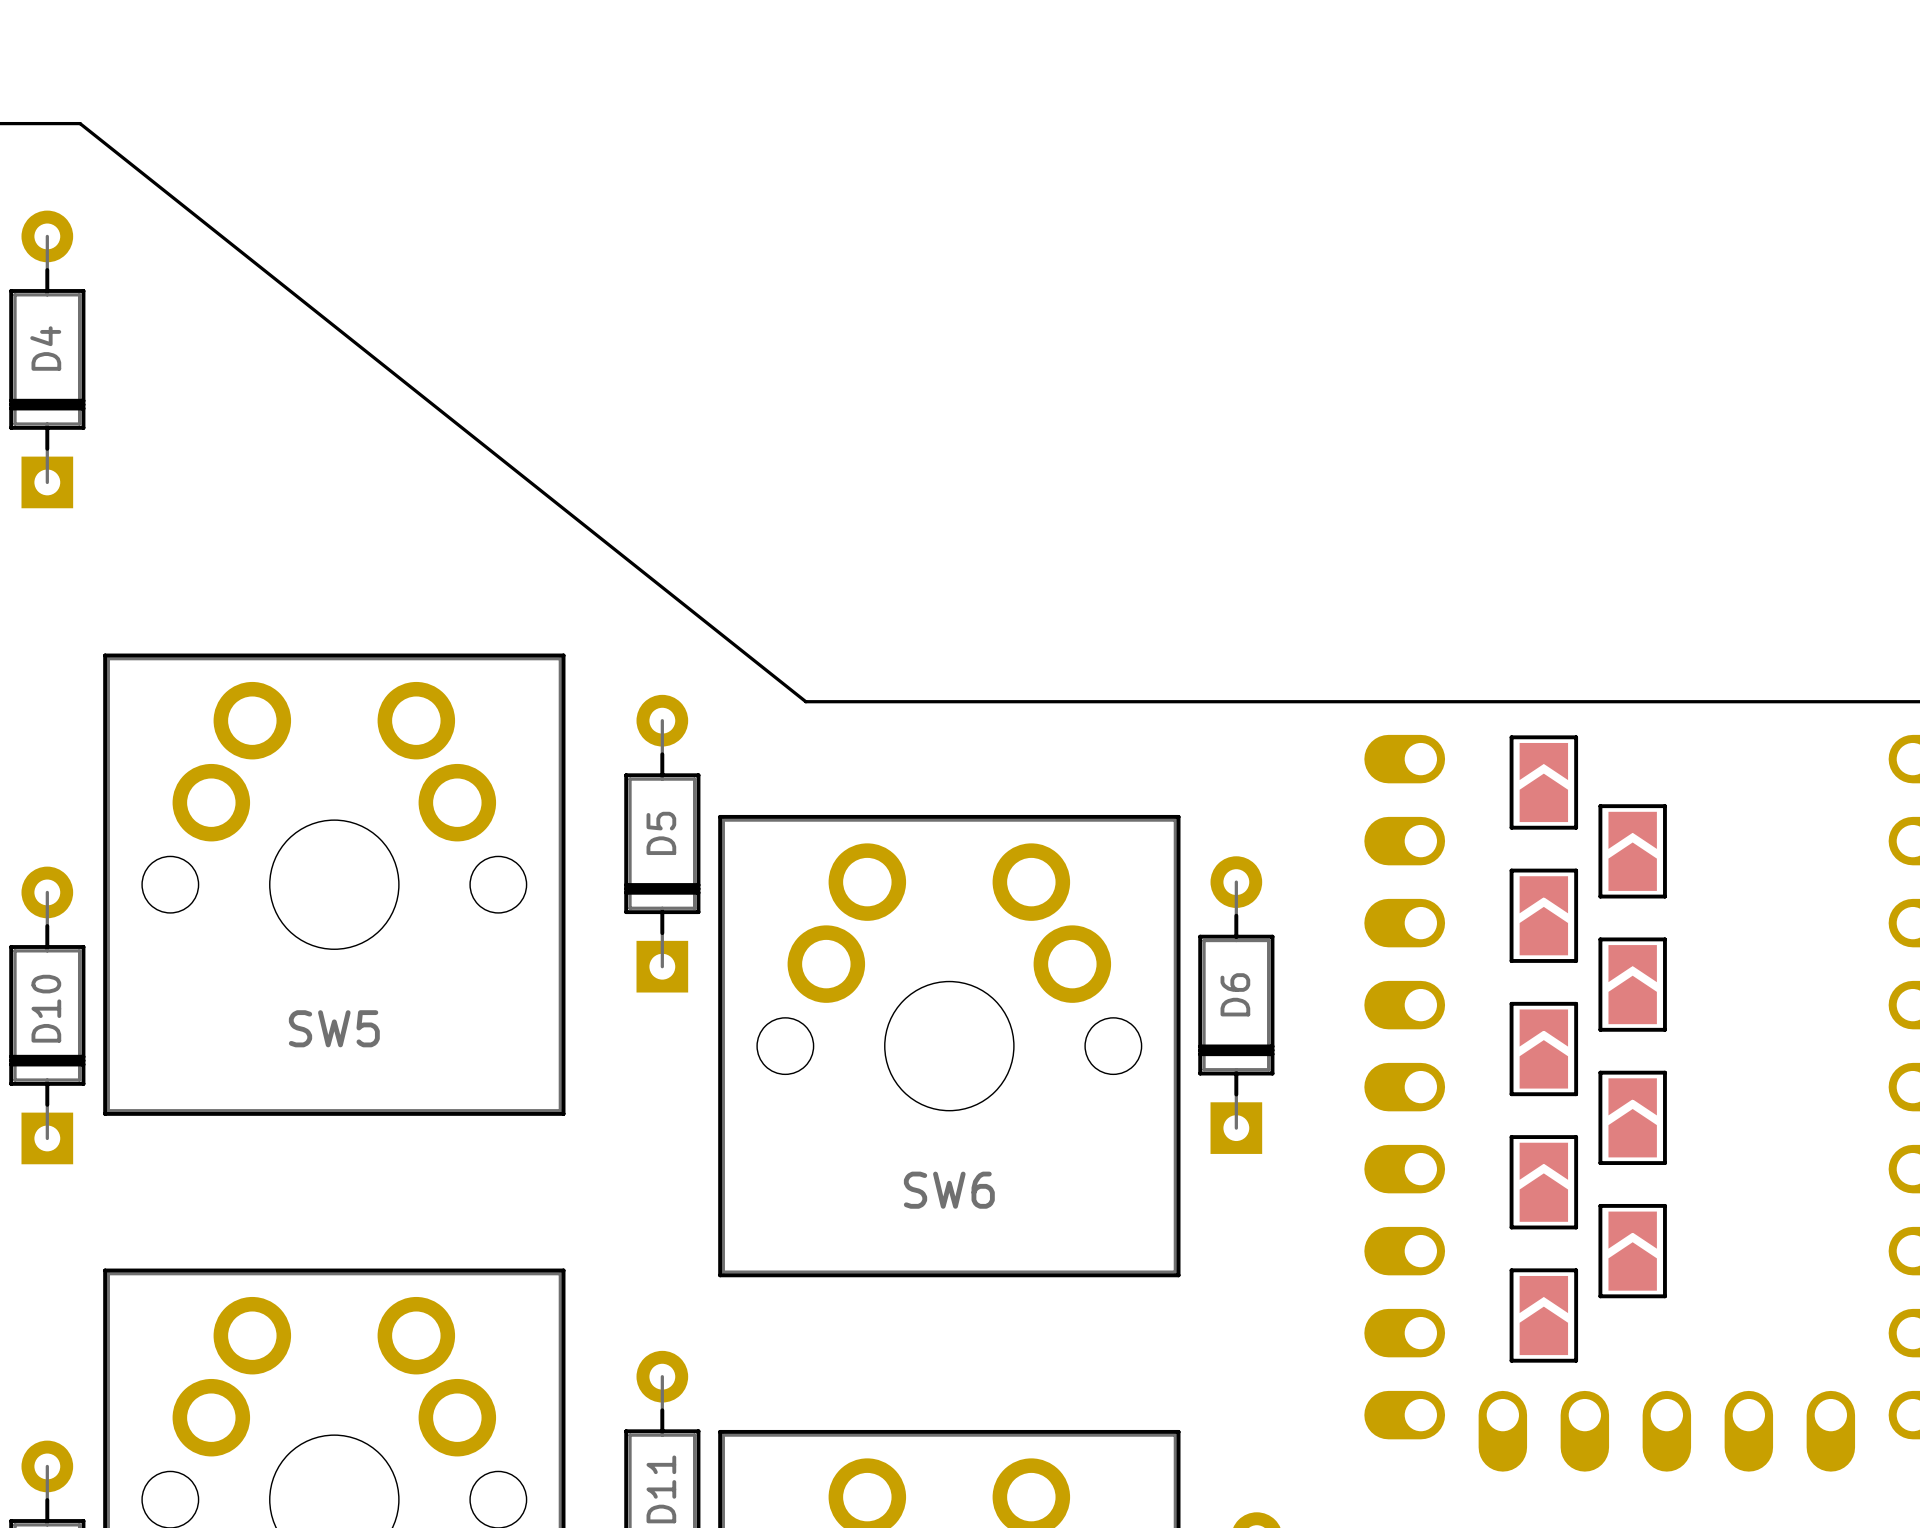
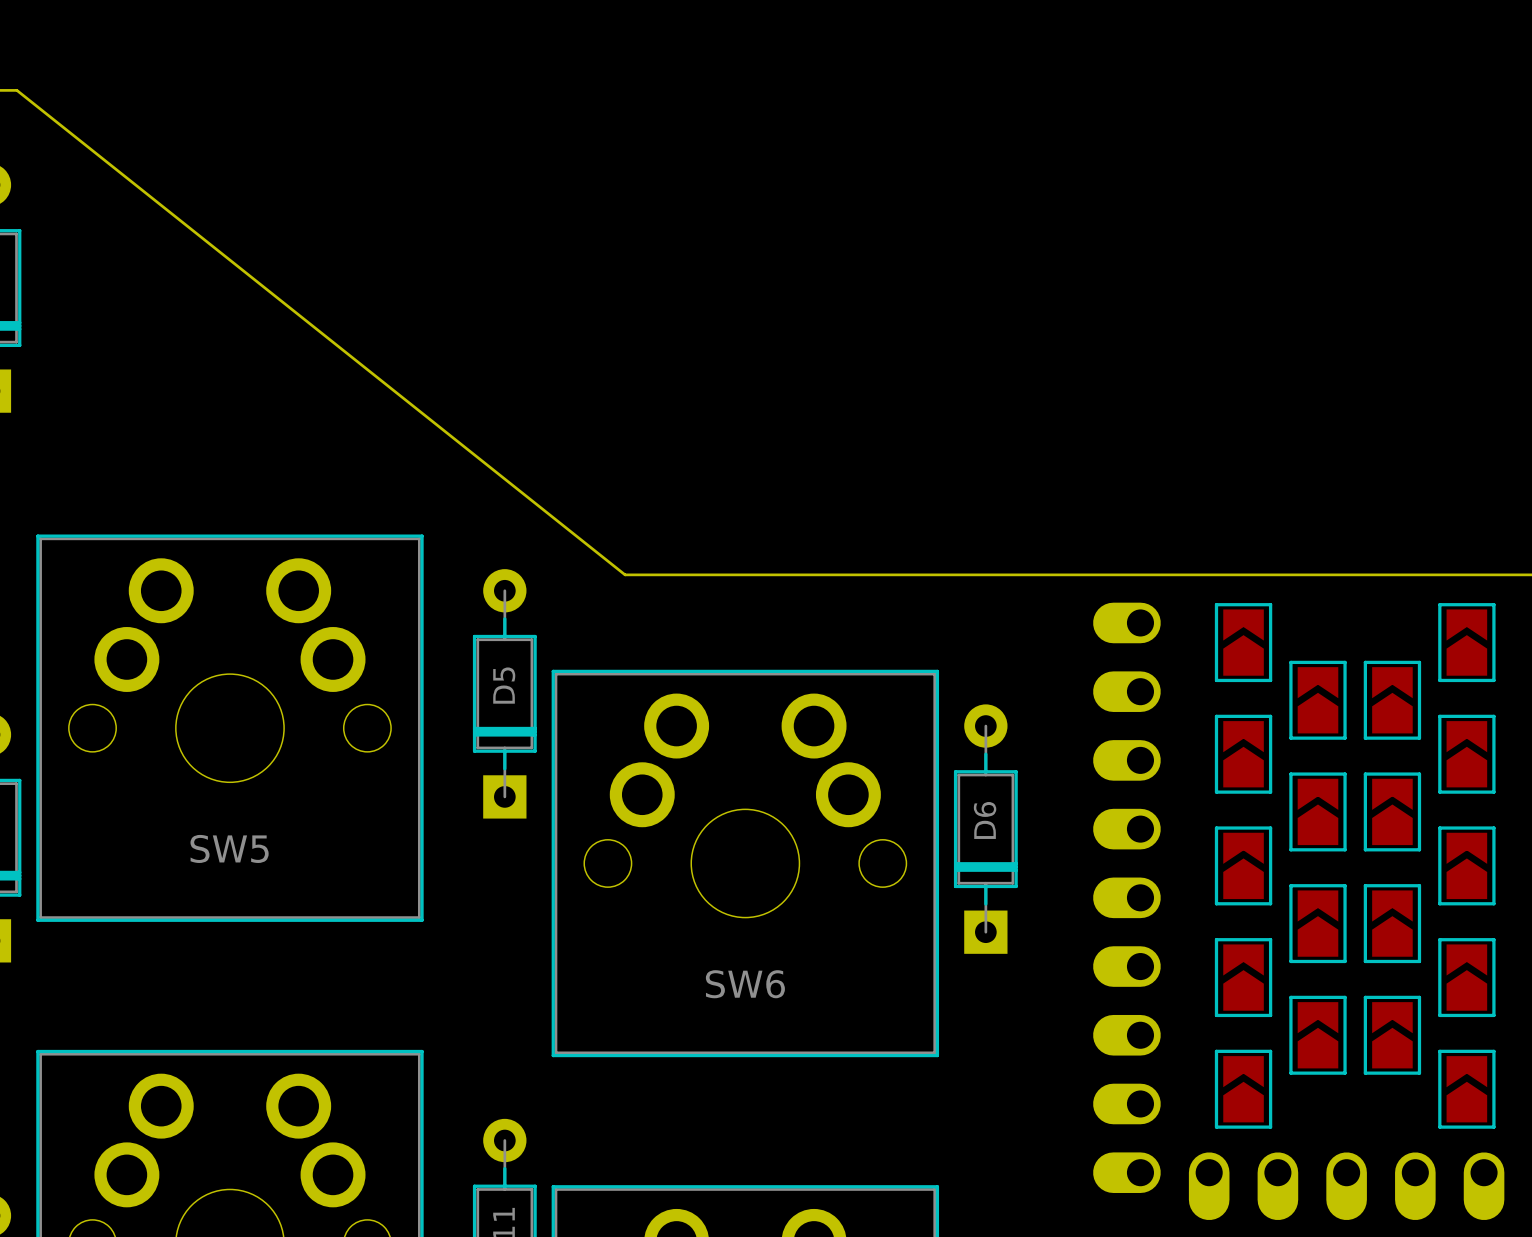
part: none -> (1466, 642)
part: none -> (1392, 700)
part: none -> (1466, 754)
part: none -> (1392, 811)
part: none -> (1466, 865)
part: none -> (1392, 923)
part: none -> (1466, 977)
part: none -> (1392, 1035)
part: none -> (1466, 1089)

